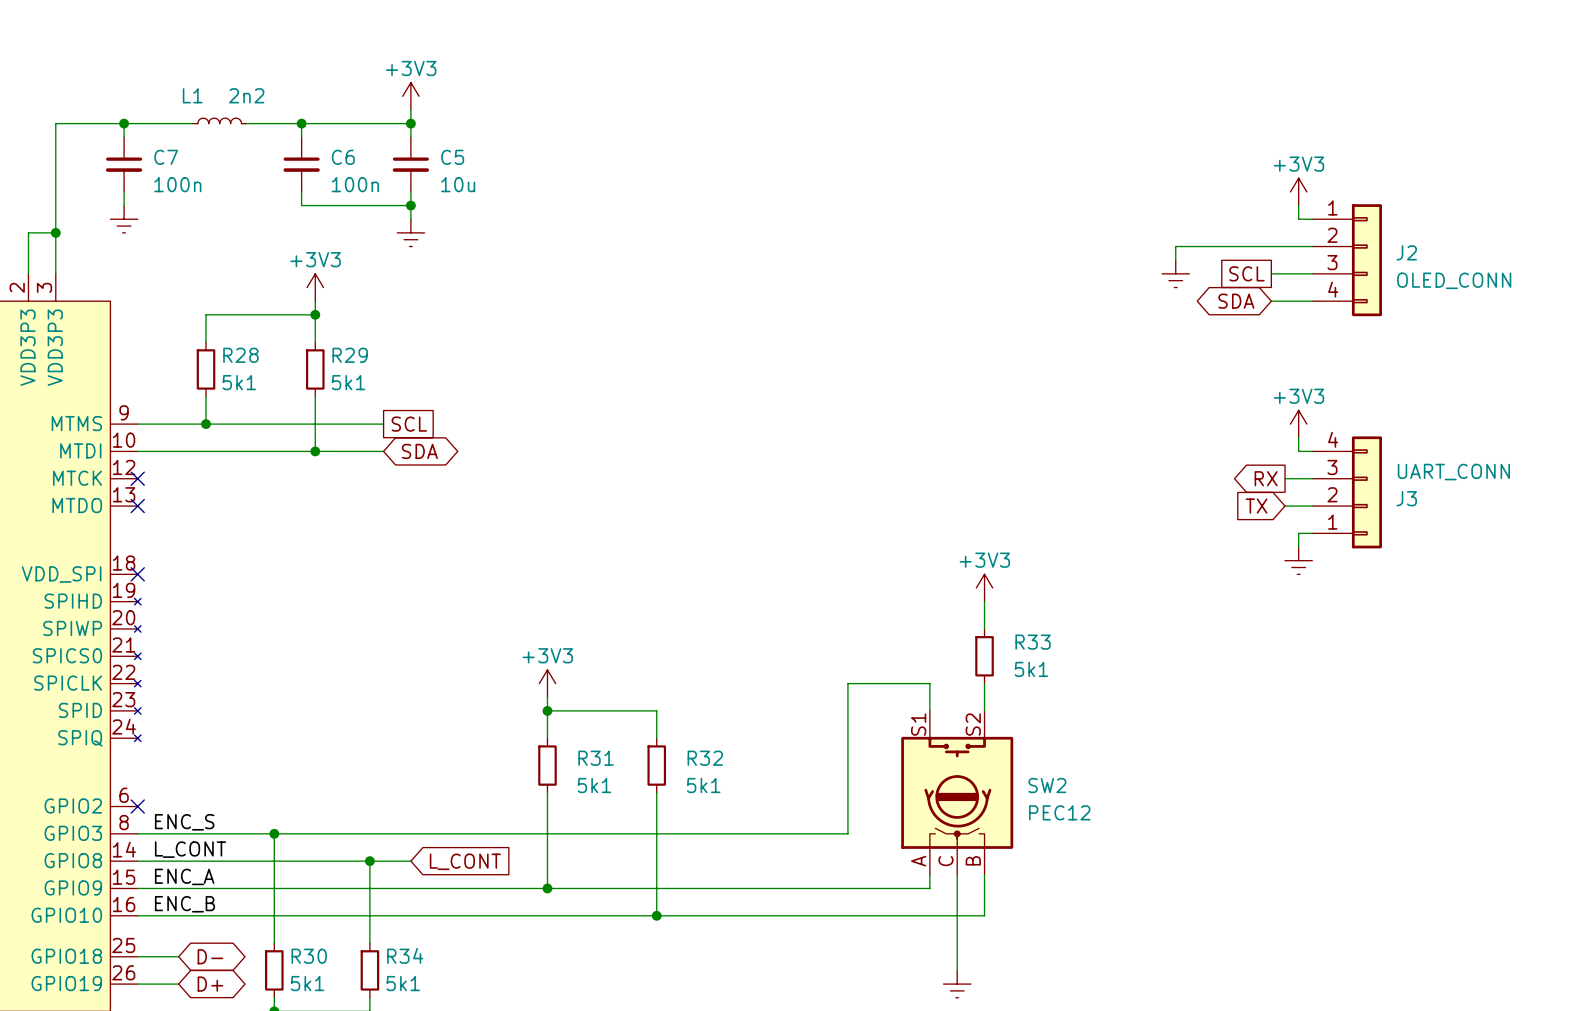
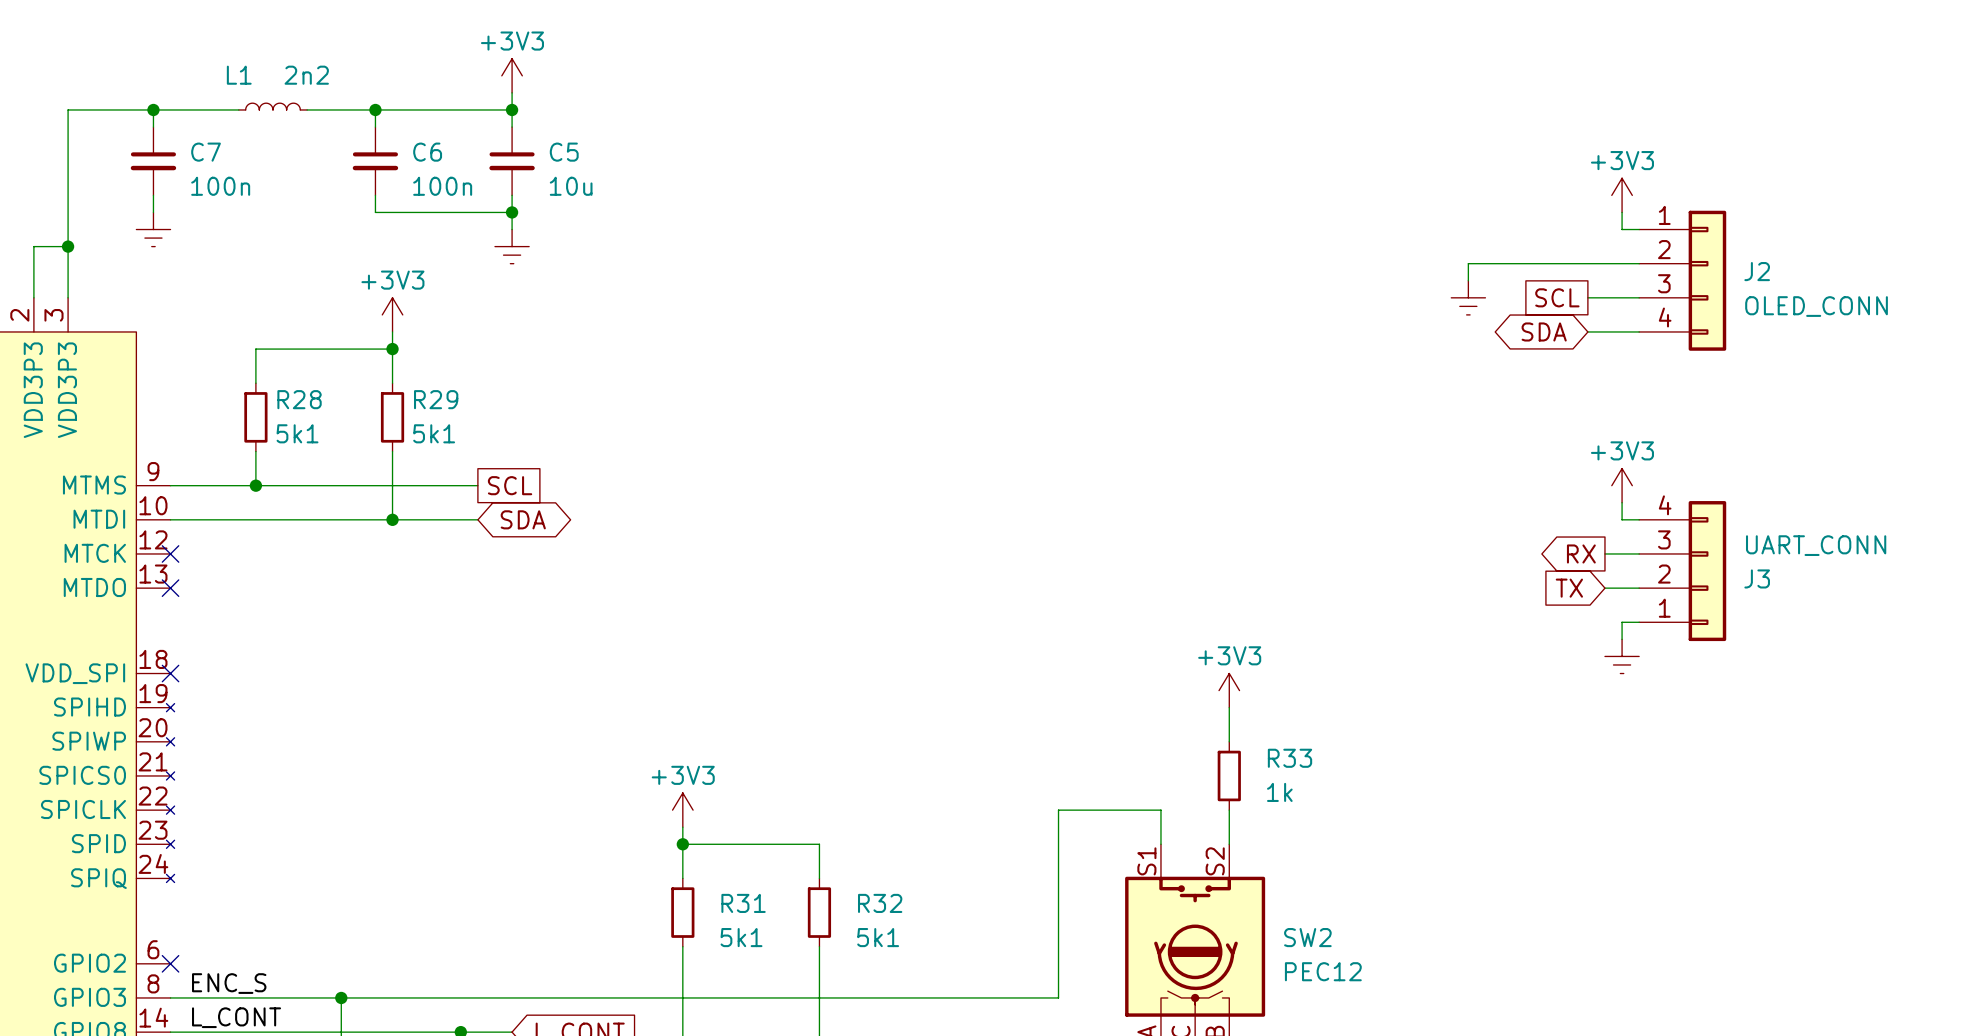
R33 value: 5k1 (1031, 669) -> 1k (1279, 792)

